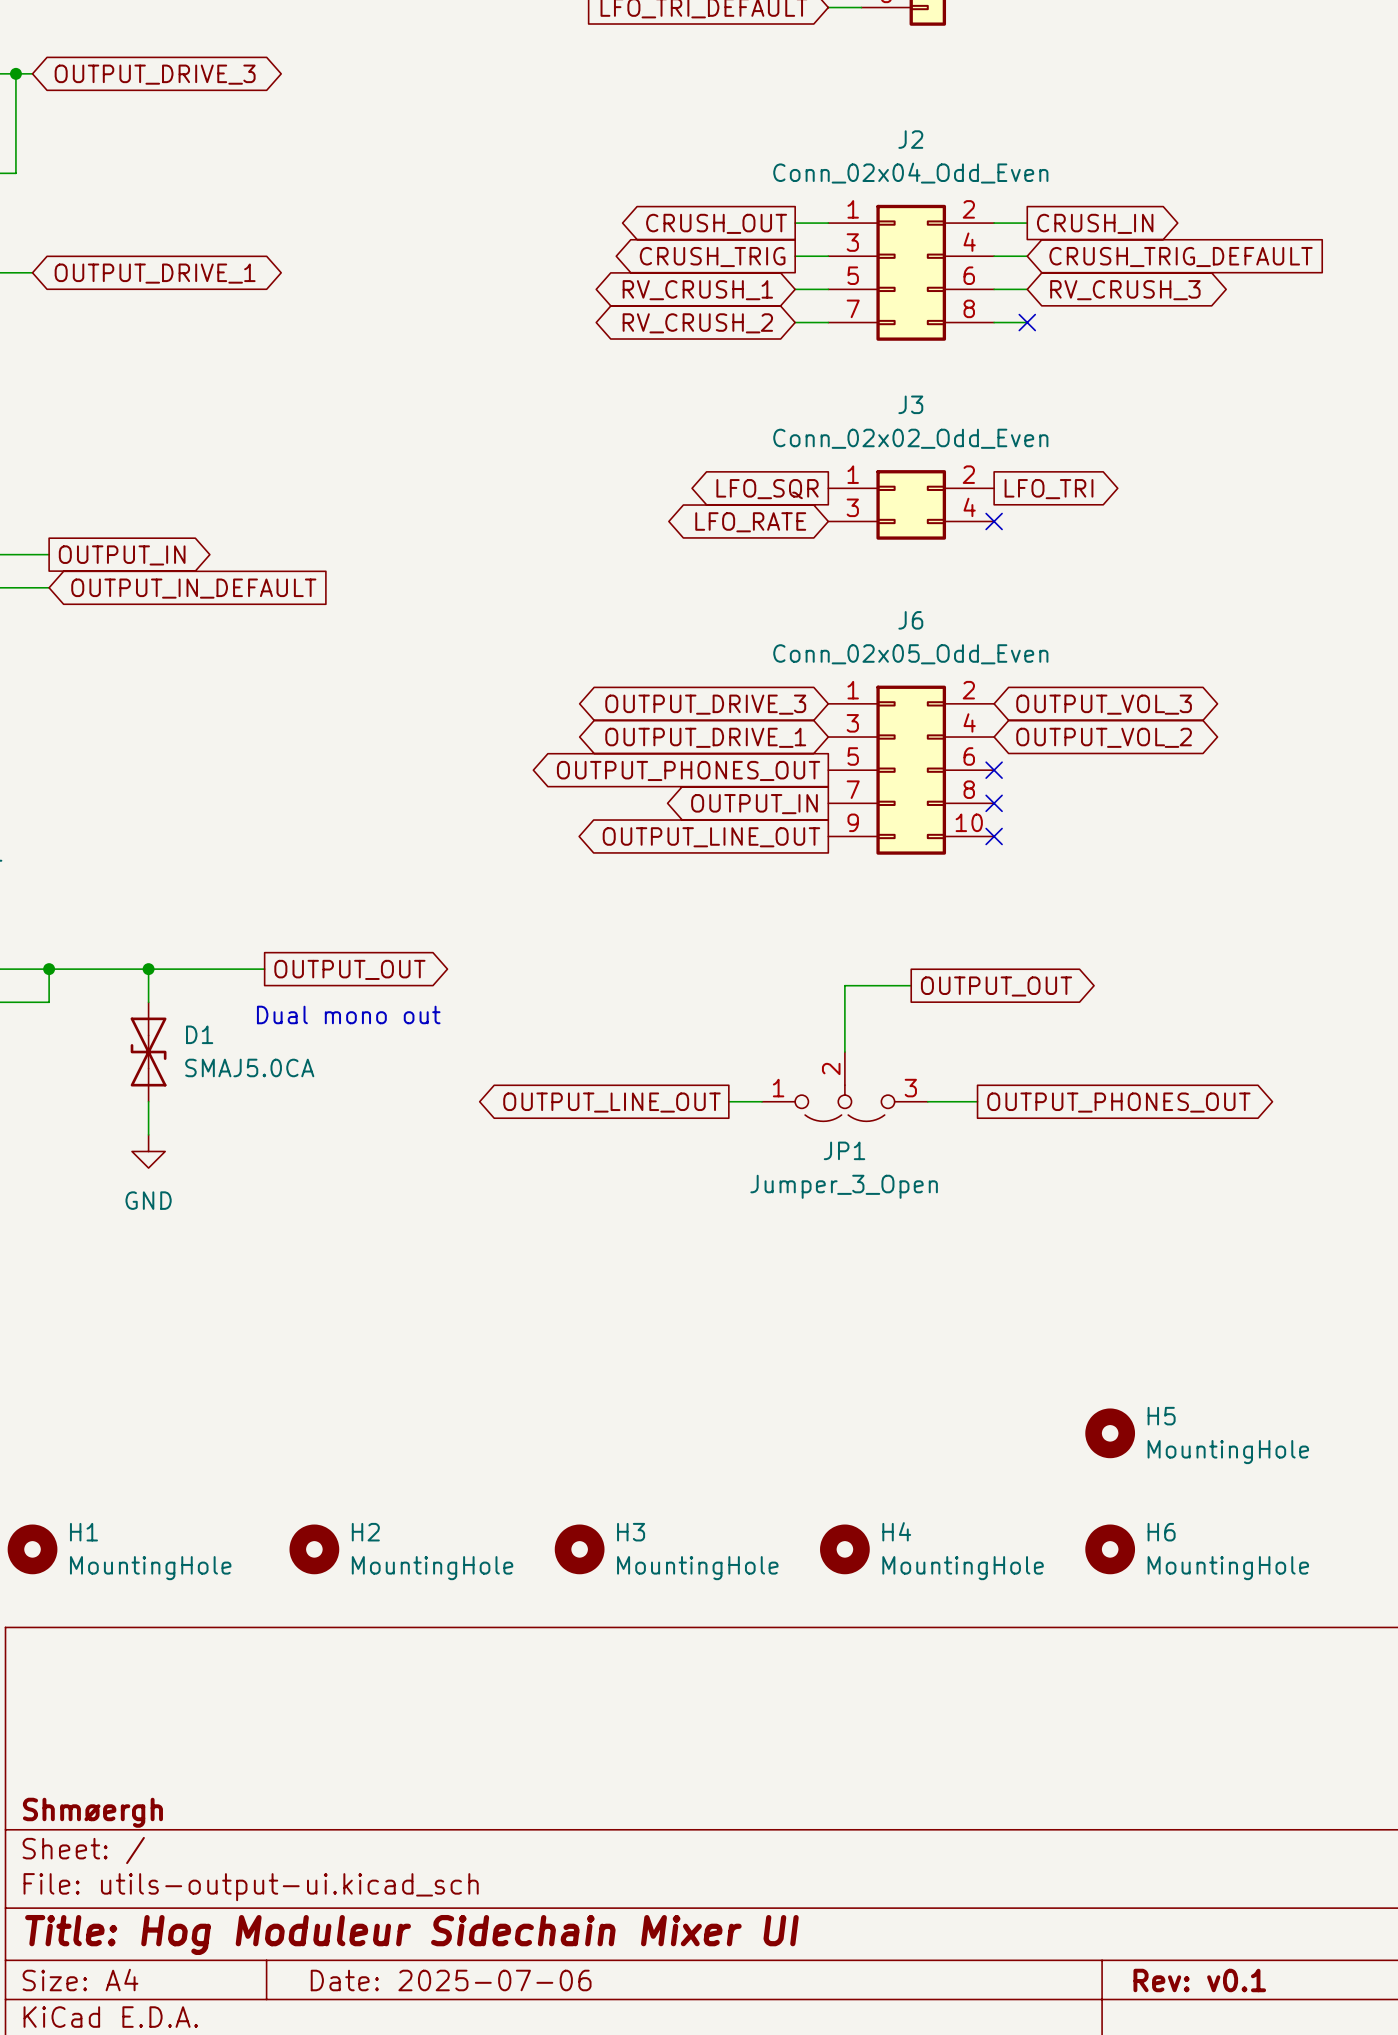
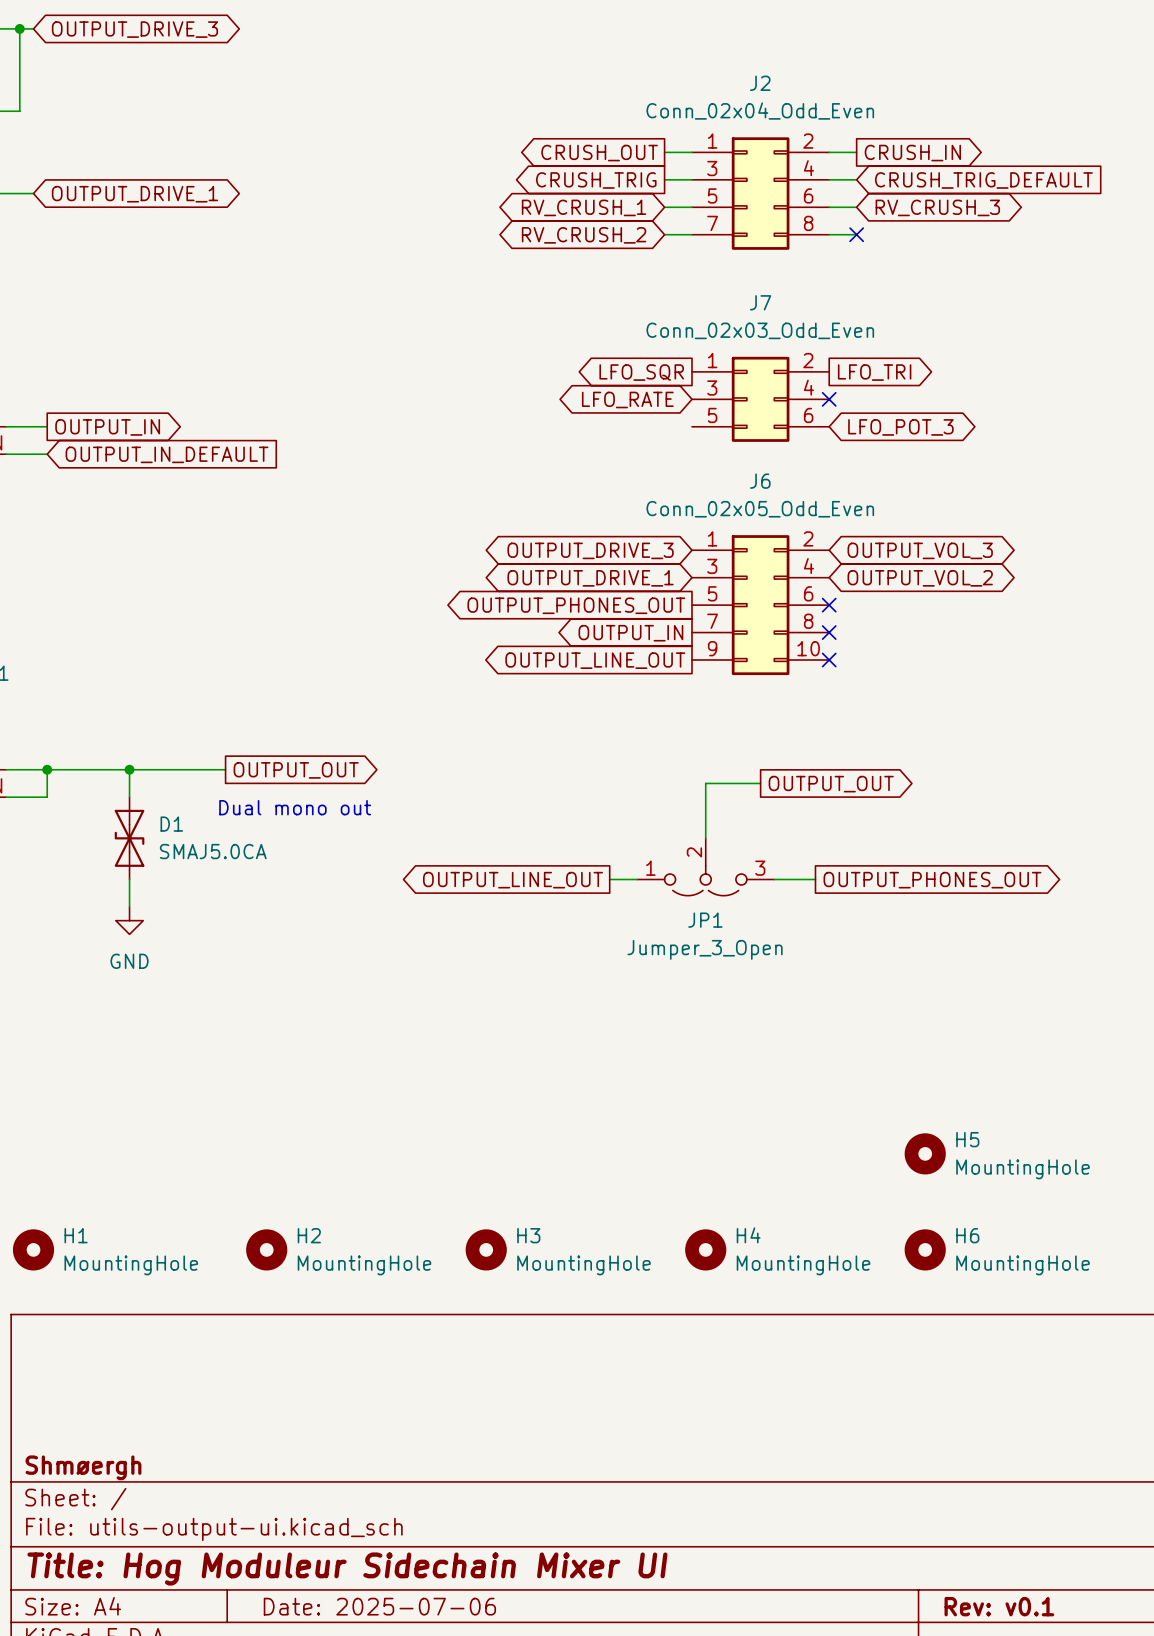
J3: Conn_02x02_Odd_Even (911, 504) -> none
J7: none -> Conn_02x03_Odd_Even (760, 399)
global label: none -> LFO_POT_3 (900, 427)

